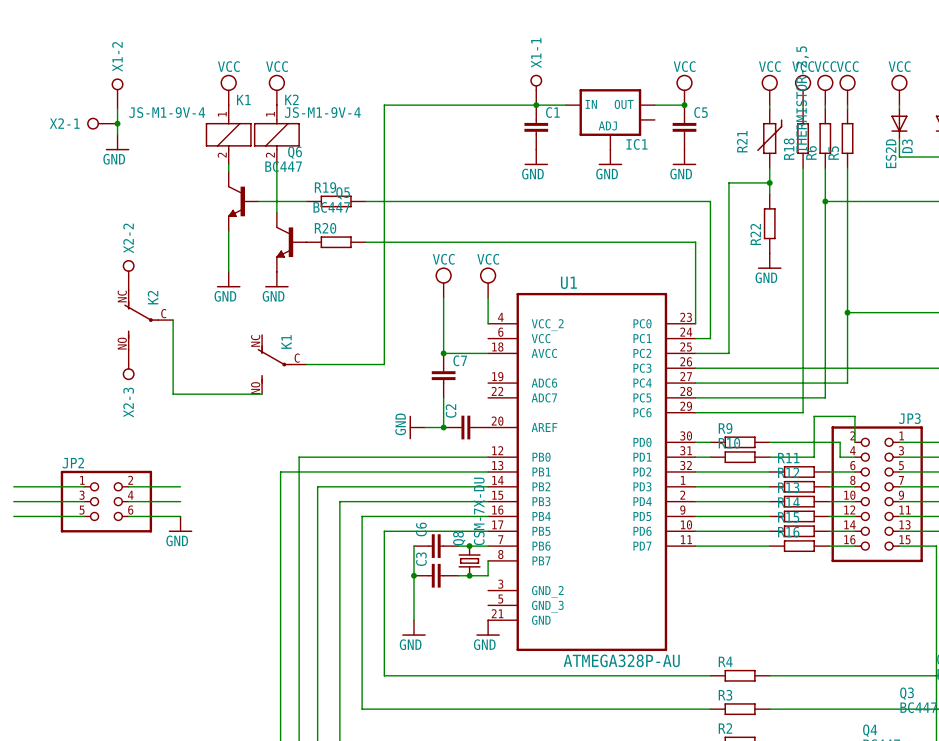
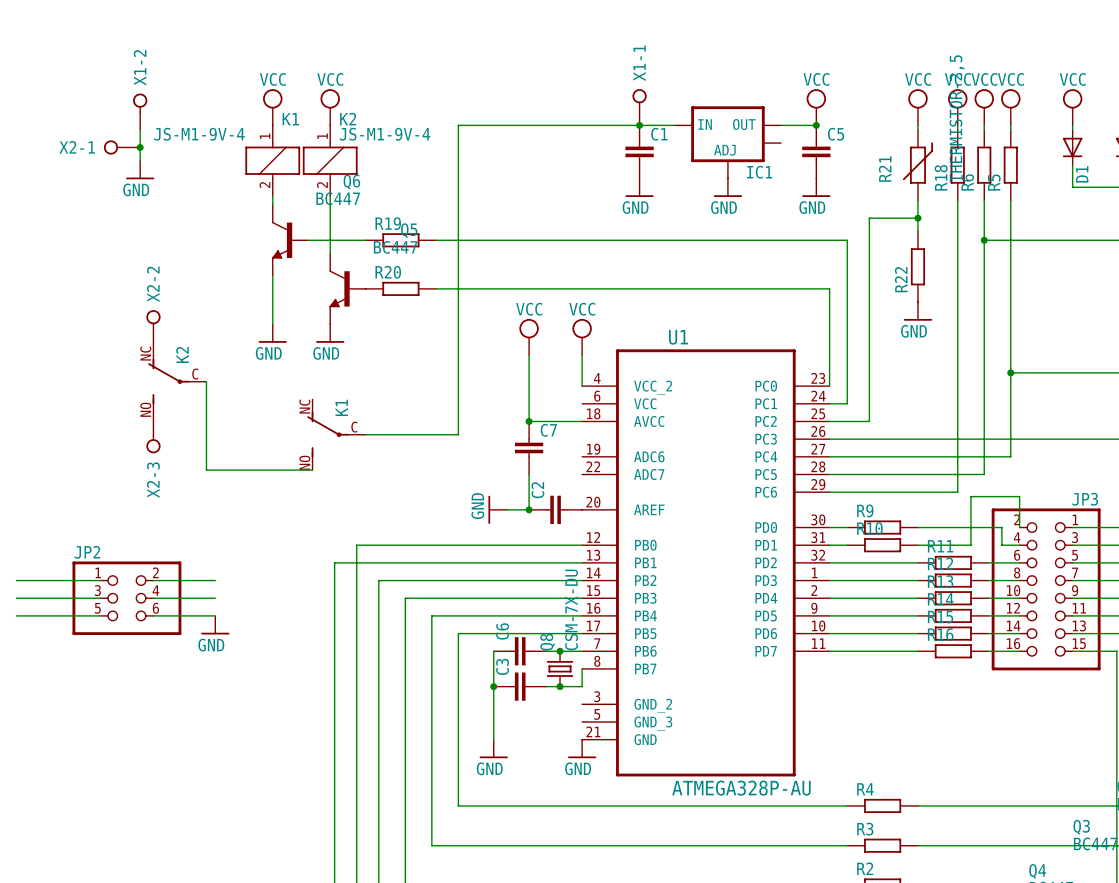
D3 name: D3 (907, 146) -> D1 (1082, 174)
D3 value: ES2D (891, 153) -> none

